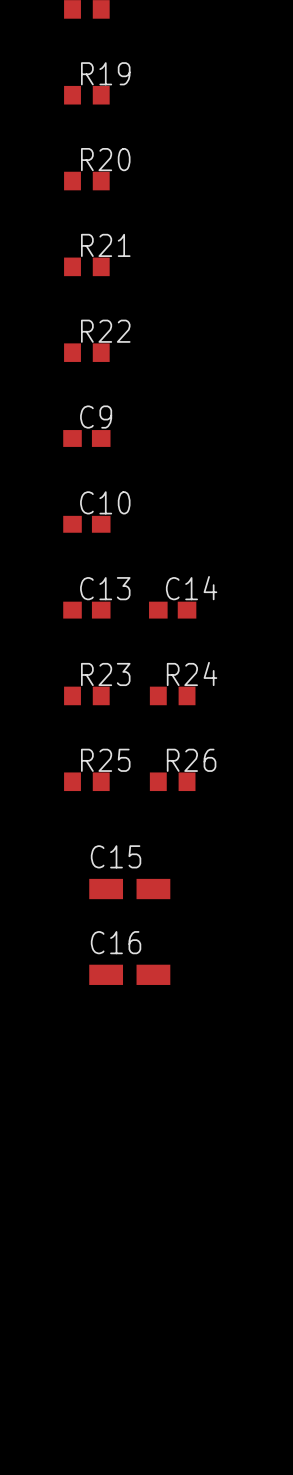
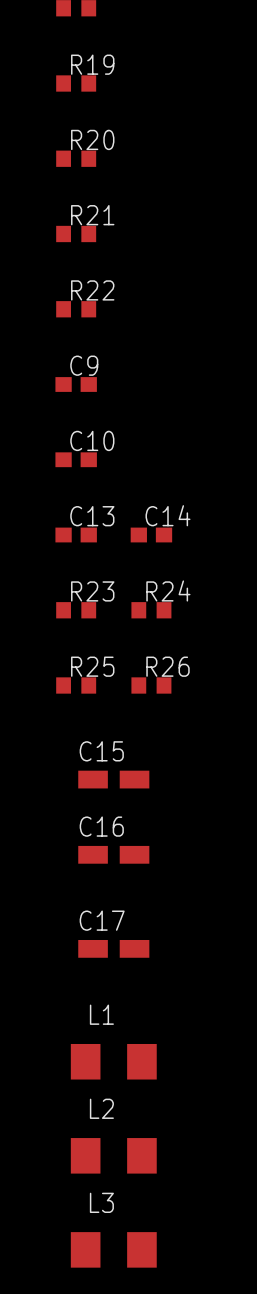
C17: none -> (113, 948)
L1: none -> (113, 1061)
L2: none -> (113, 1155)
L3: none -> (113, 1249)

